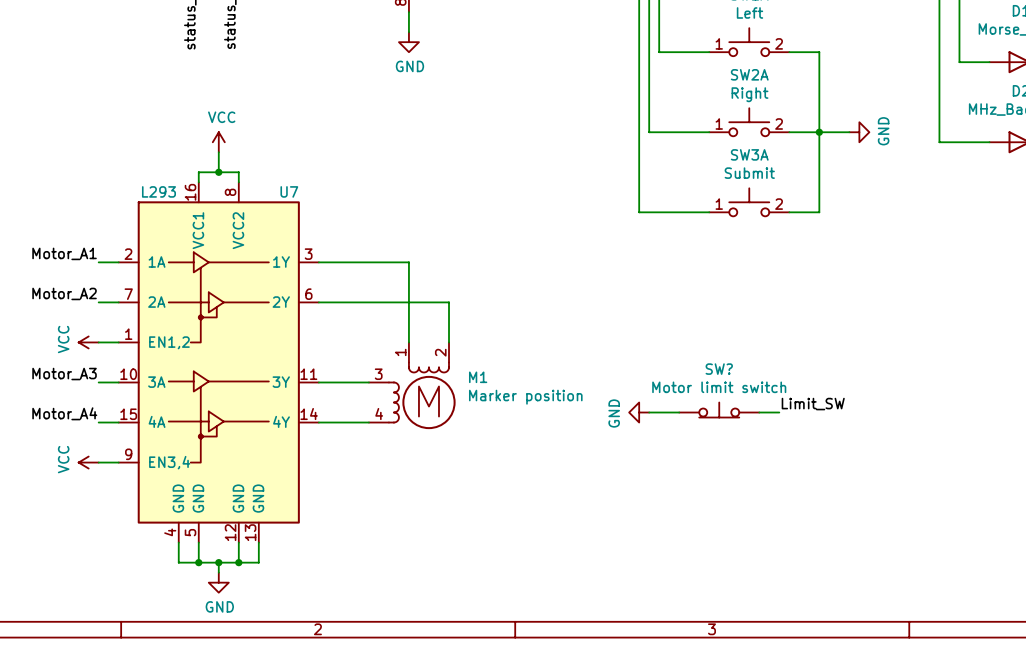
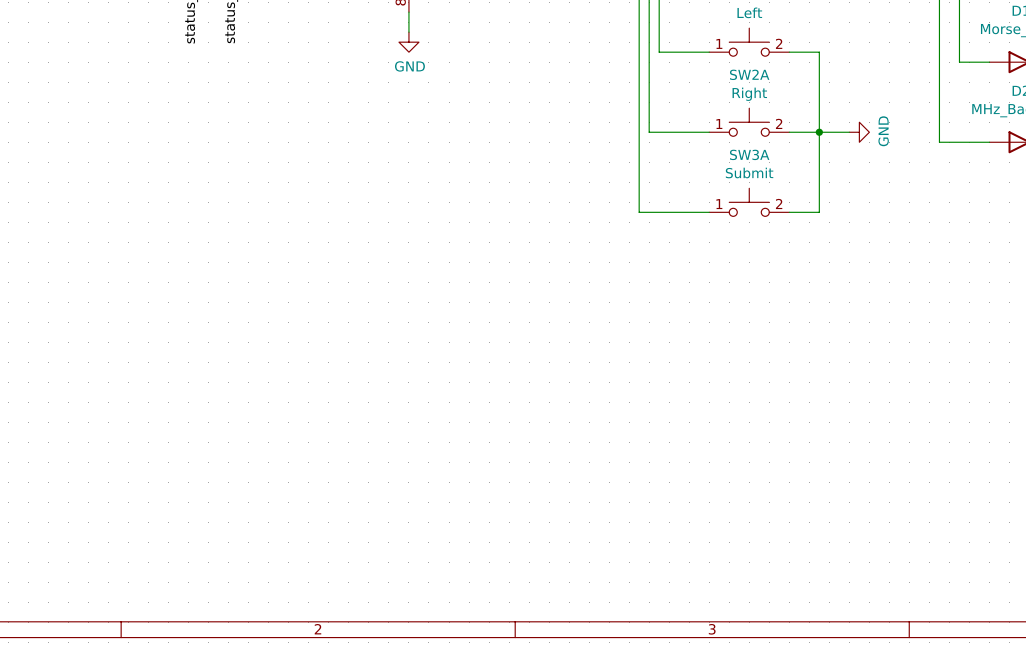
power symbol: VCC (218, 142) -> none
wire: (218, 152) (218, 172) -> none
junction: (218, 172) -> none
wire: (198, 182) (198, 172) (238, 172) (238, 182) -> none
label: Motor_A1 (64, 253) -> none
wire: (98, 262) (118, 262) -> none
wire: (318, 262) (408, 262) (408, 342) -> none
label: Motor_A2 (64, 293) -> none
wire: (98, 302) (118, 302) -> none
wire: (318, 302) (449, 302) (449, 342) -> none
power symbol: VCC (88, 342) -> none
wire: (98, 342) (118, 342) -> none
U7: L293 (218, 362) -> none
label: Motor_A3 (64, 374) -> none
wire: (98, 382) (118, 382) -> none
wire: (318, 382) (368, 382) -> none
M1: Marker position (412, 385) -> none
label: Limit_SW (813, 404) -> none
SW?: Motor limit switch (719, 410) -> none
power symbol: GND (639, 412) -> none
wire: (649, 412) (679, 412) -> none
wire: (759, 412) (779, 412) -> none
label: Motor_A4 (64, 413) -> none
wire: (98, 422) (118, 422) -> none
wire: (318, 422) (368, 422) -> none
power symbol: VCC (88, 462) -> none
wire: (98, 462) (118, 462) -> none
wire: (178, 542) (178, 562) (258, 562) (258, 542) -> none
wire: (198, 542) (198, 562) -> none
wire: (238, 542) (238, 562) -> none
junction: (198, 562) -> none
wire: (218, 562) (218, 572) -> none
junction: (218, 562) -> none
junction: (238, 562) -> none
power symbol: GND (218, 582) -> none

